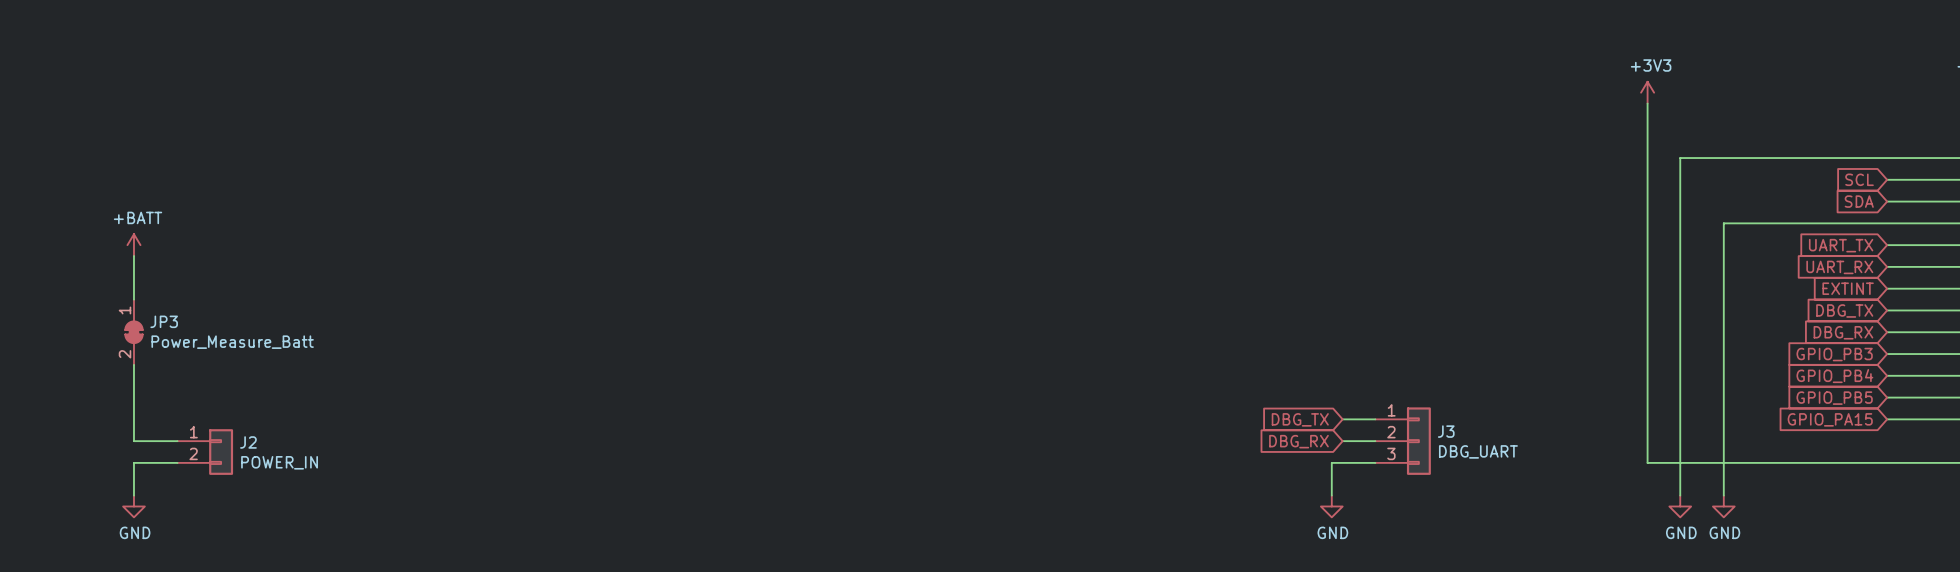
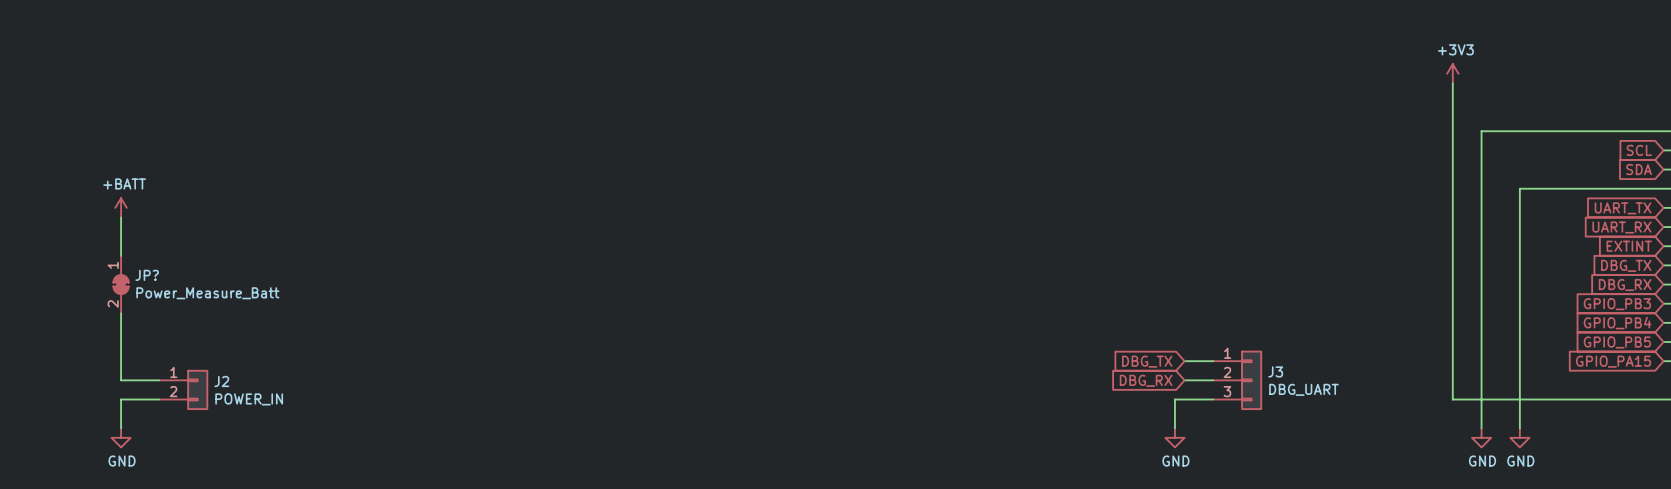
JP3 name: JP3 (164, 321) -> JP? (147, 275)

